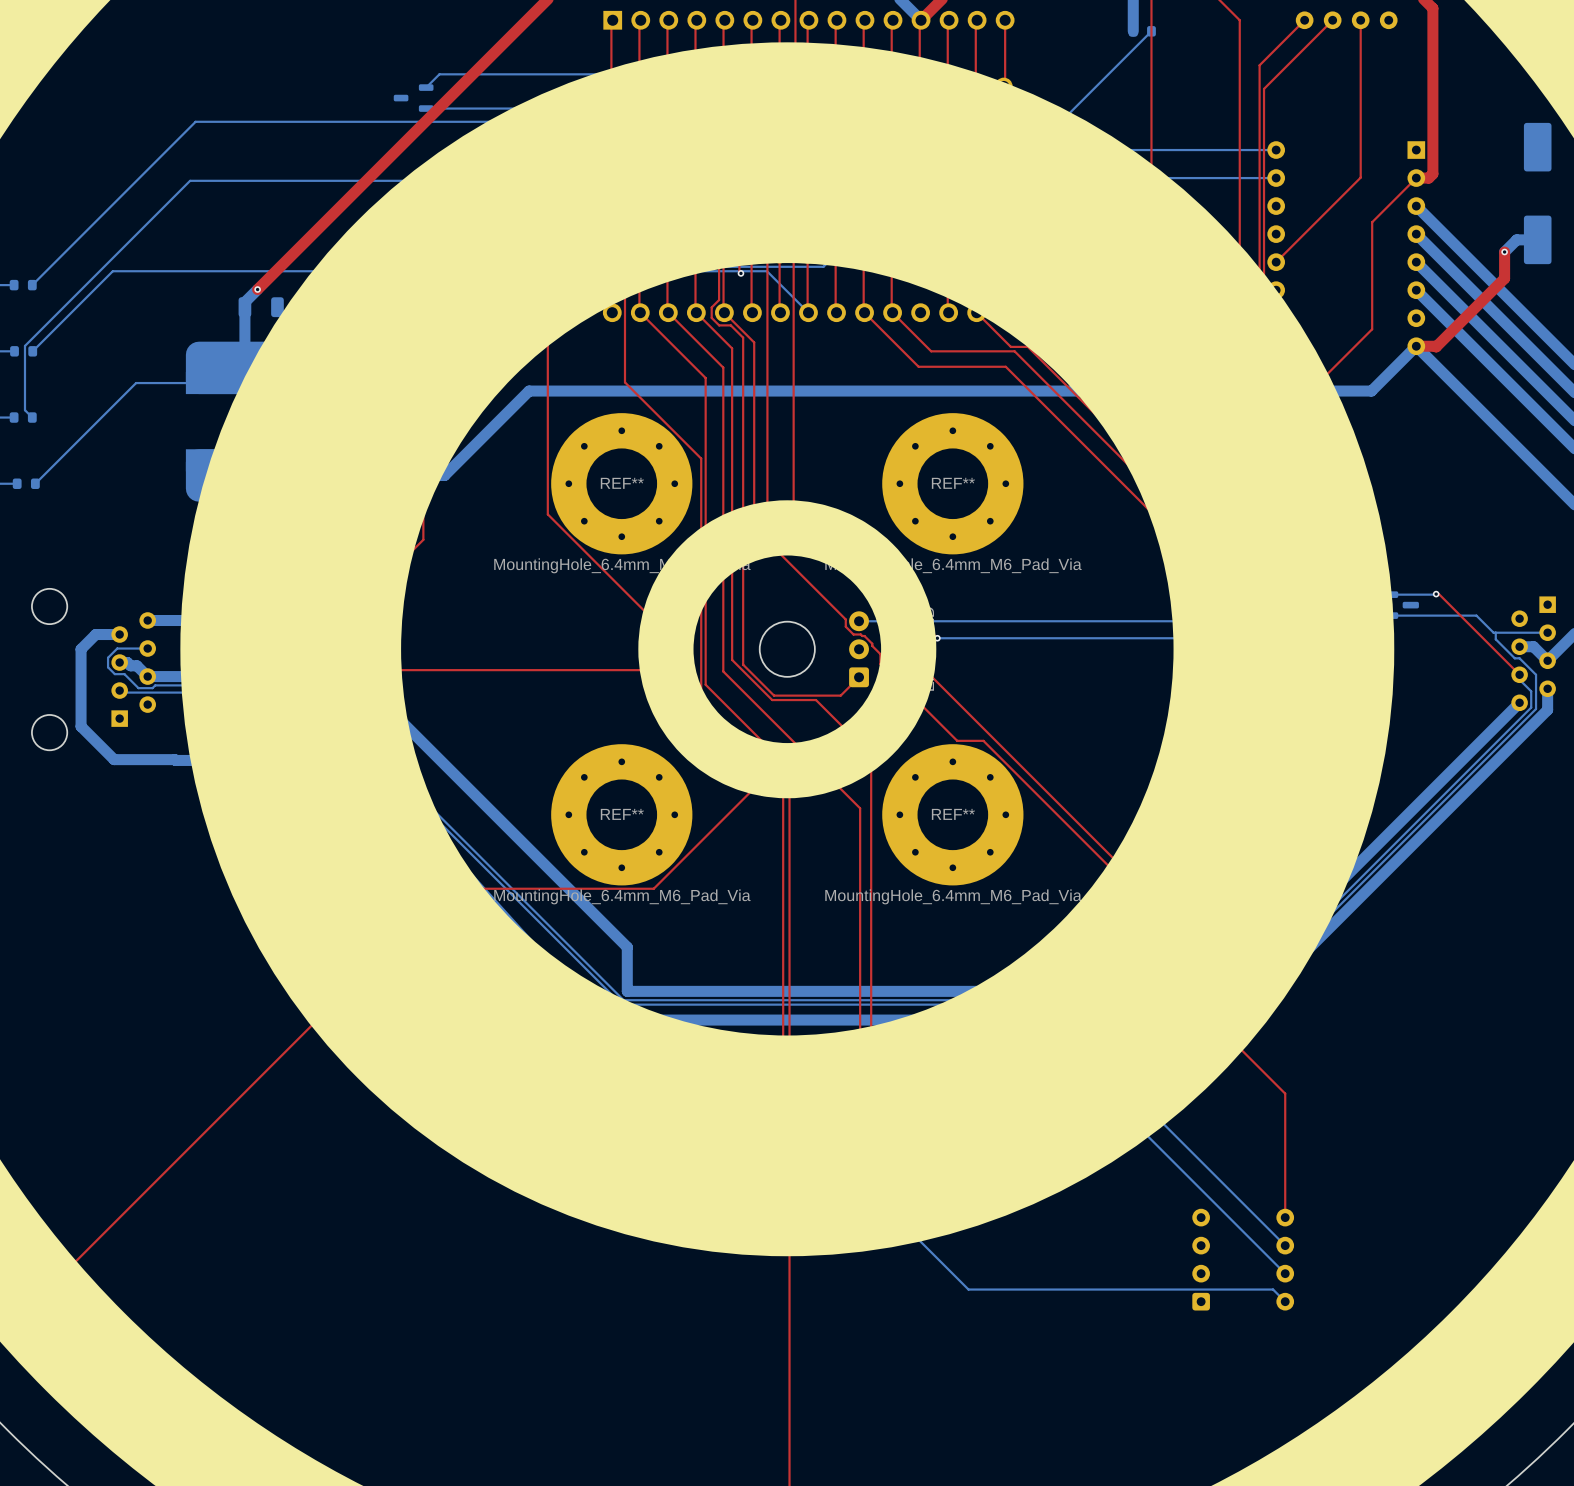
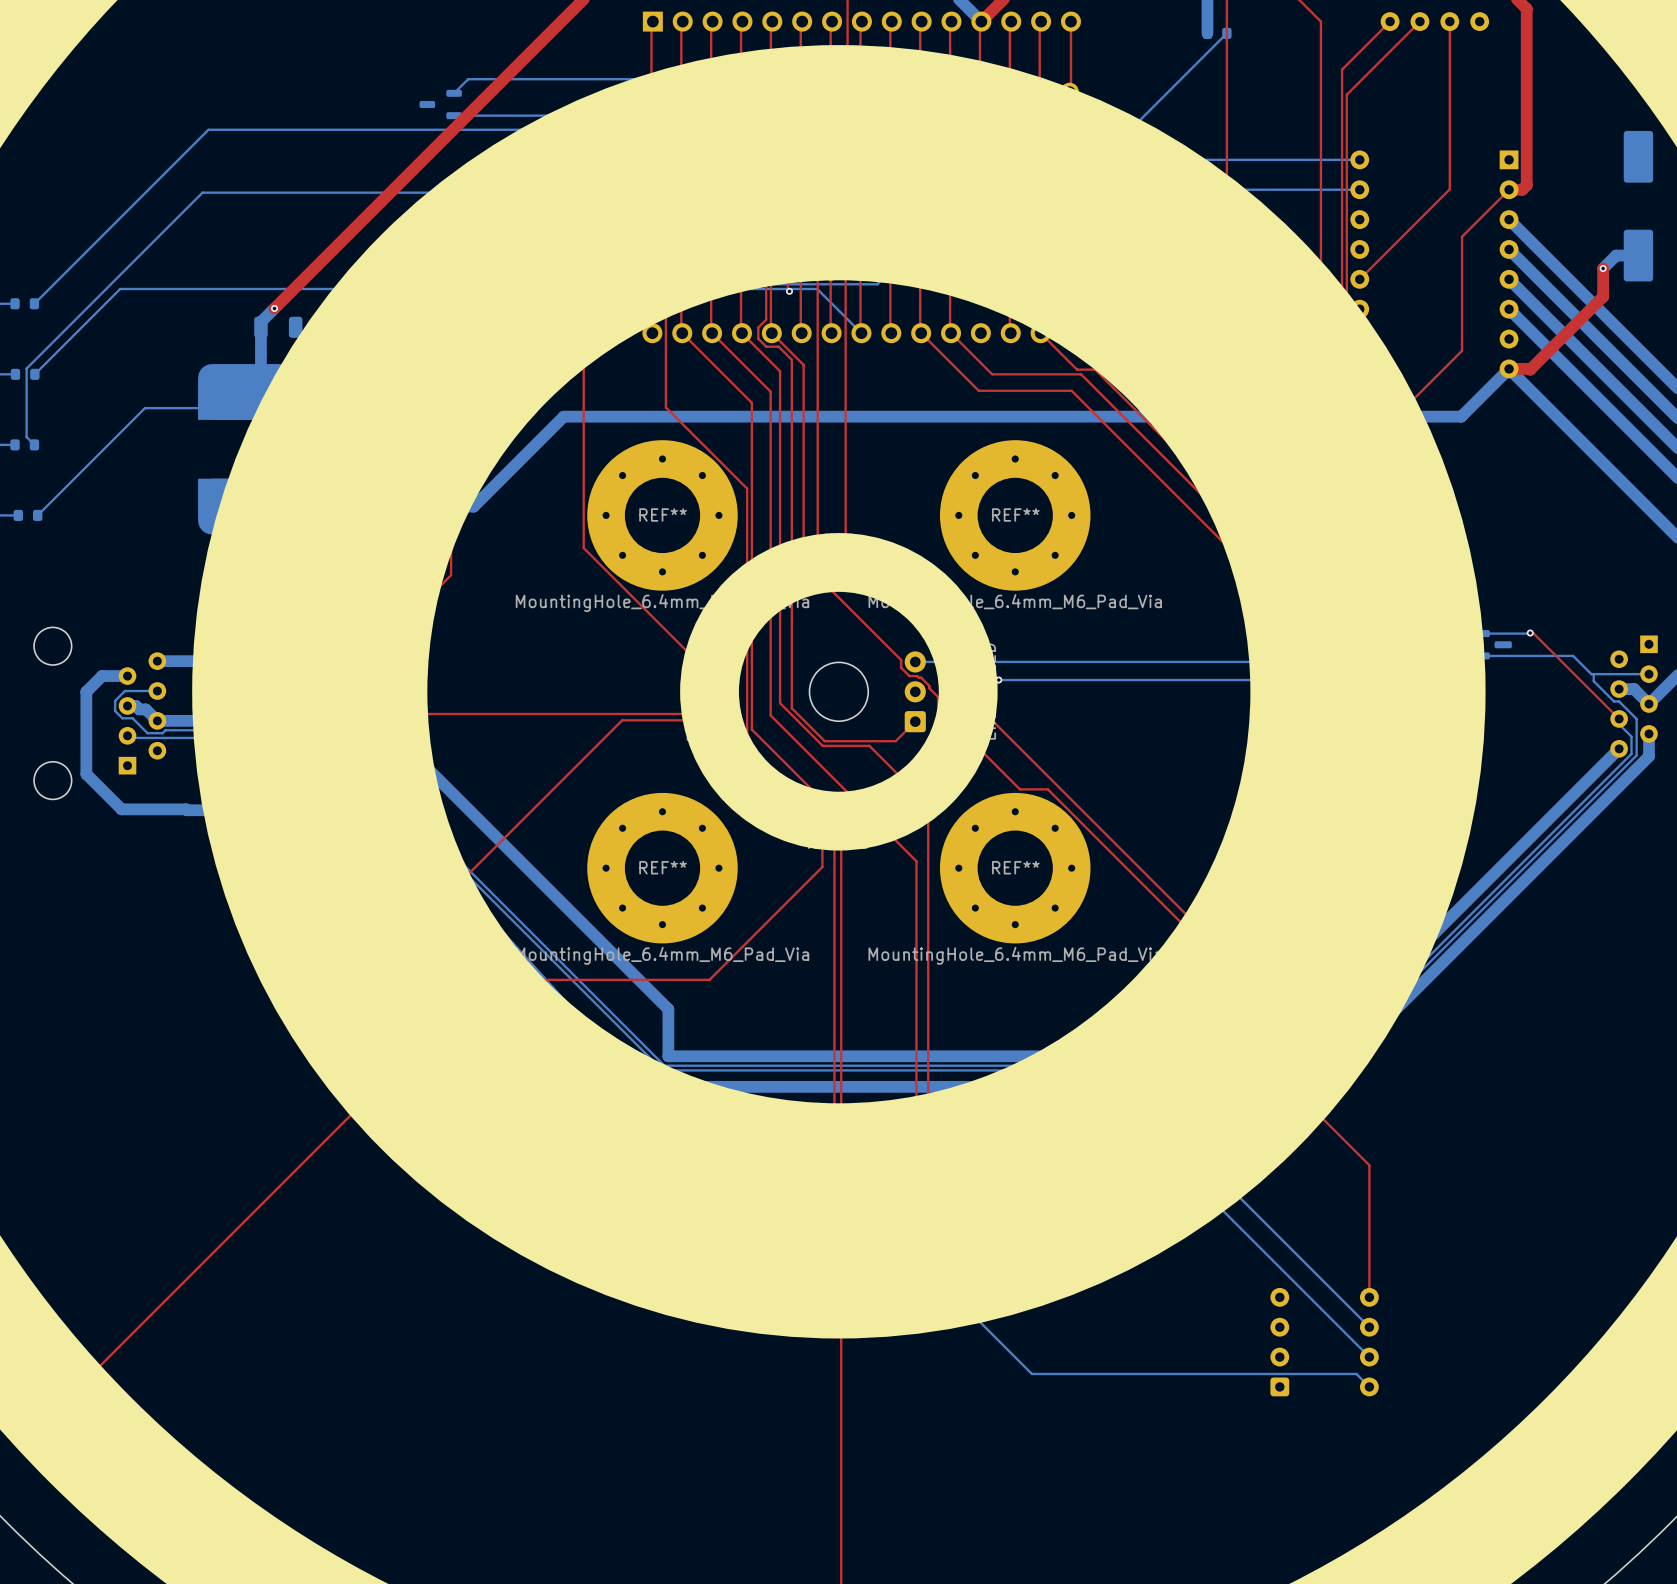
top track: none -> (715, 676) (729, 690) (729, 716) (725, 720) (622, 720) (451, 891) (451, 991)
top track: (771, 770) (653, 888) (448, 888) (42, 1294) -> (822, 821) (822, 866) (709, 979) (486, 979) (86, 1379) (45, 1379)

